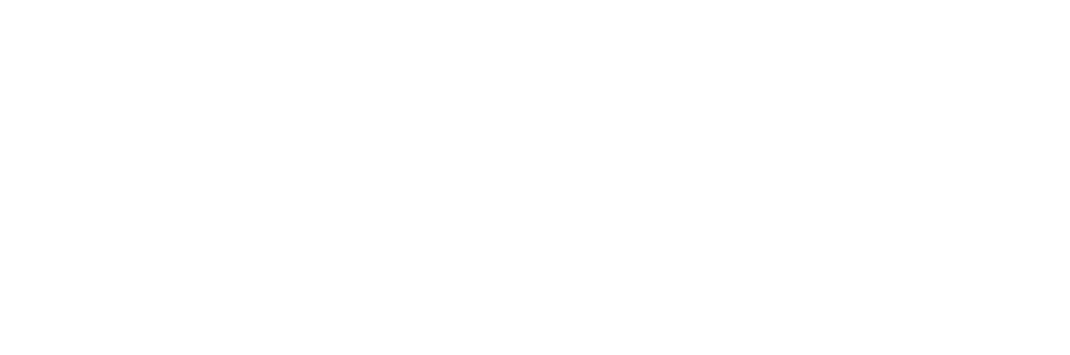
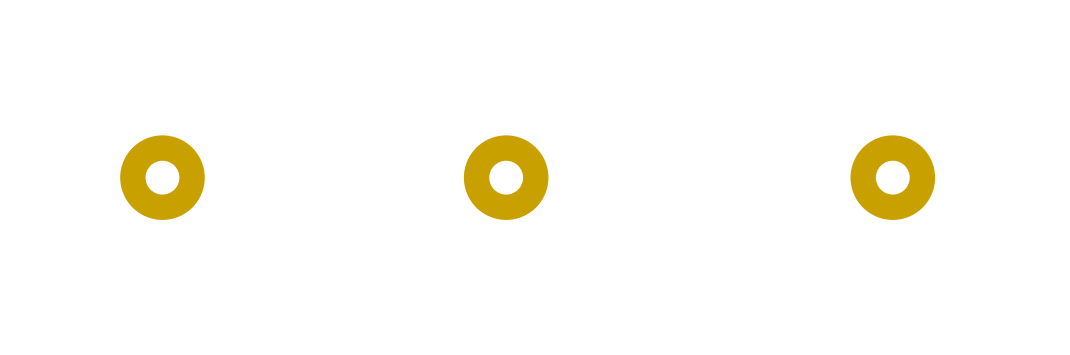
part: none -> (162, 177)
part: none -> (506, 177)
part: none -> (892, 177)

